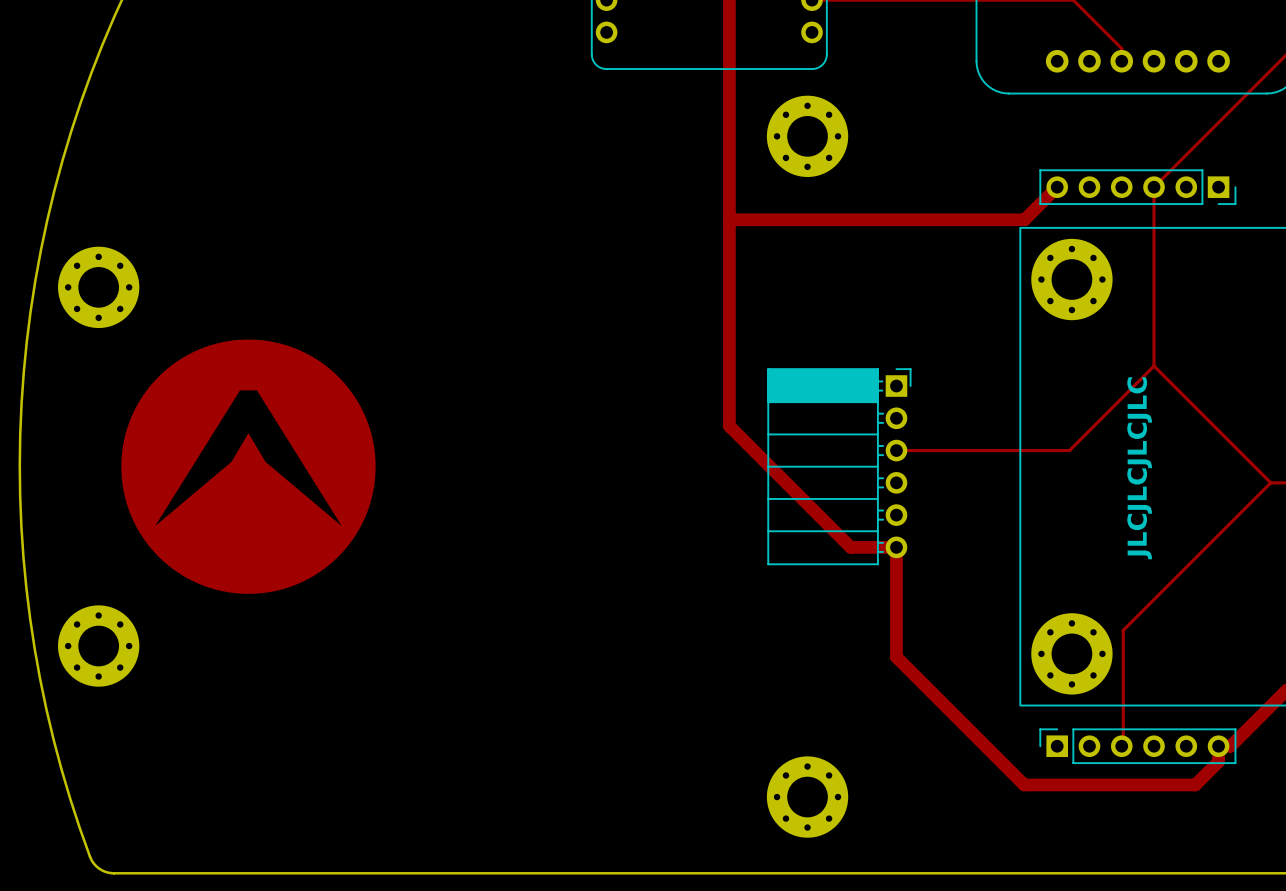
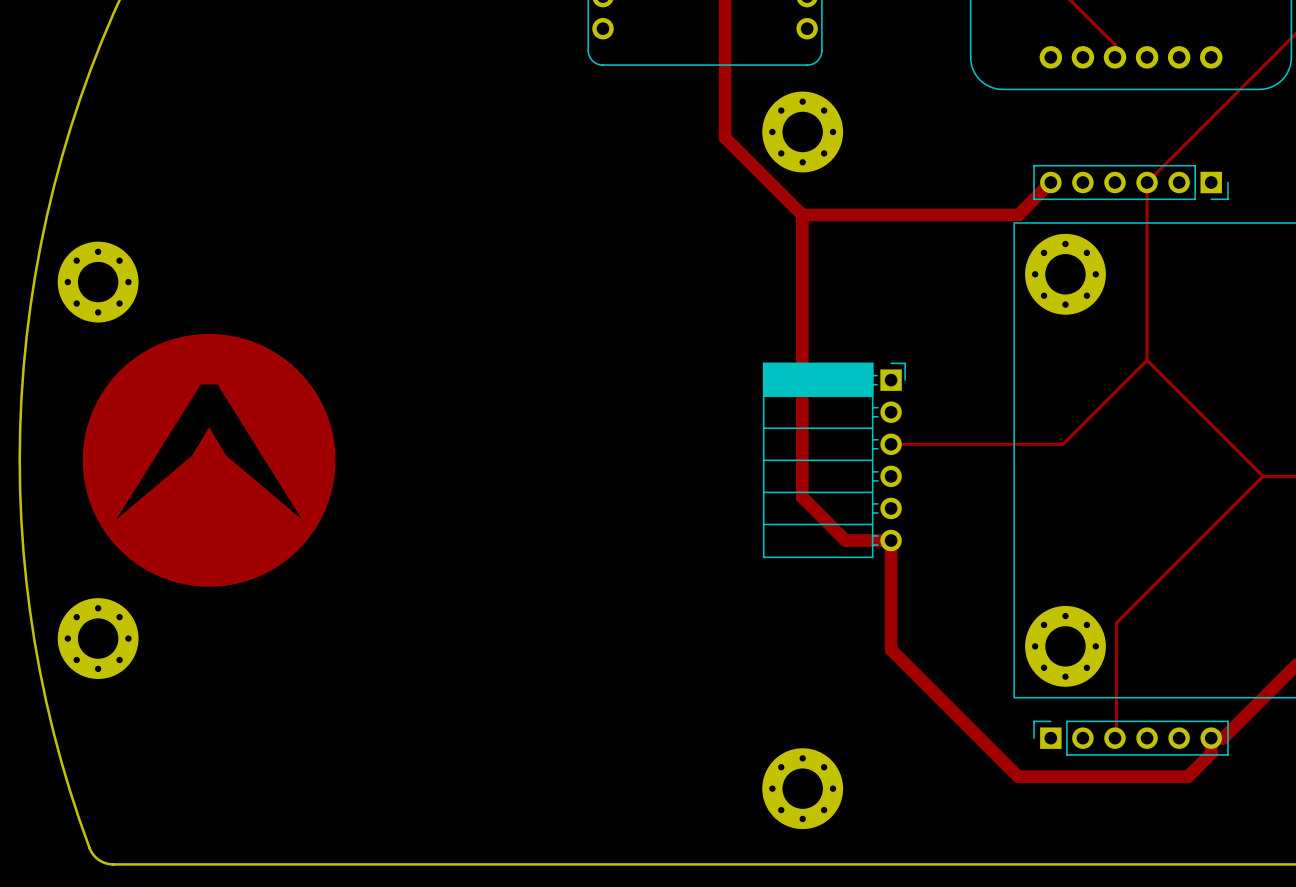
track: (729, 142) (729, 426) (807, 503) -> (725, 137) (802, 214) (802, 497)
track: (807, 219) (729, 220) -> none
part position: (248, 466) -> (209, 460)
text: JLCJLCJLCJLC (1139, 468) -> none

